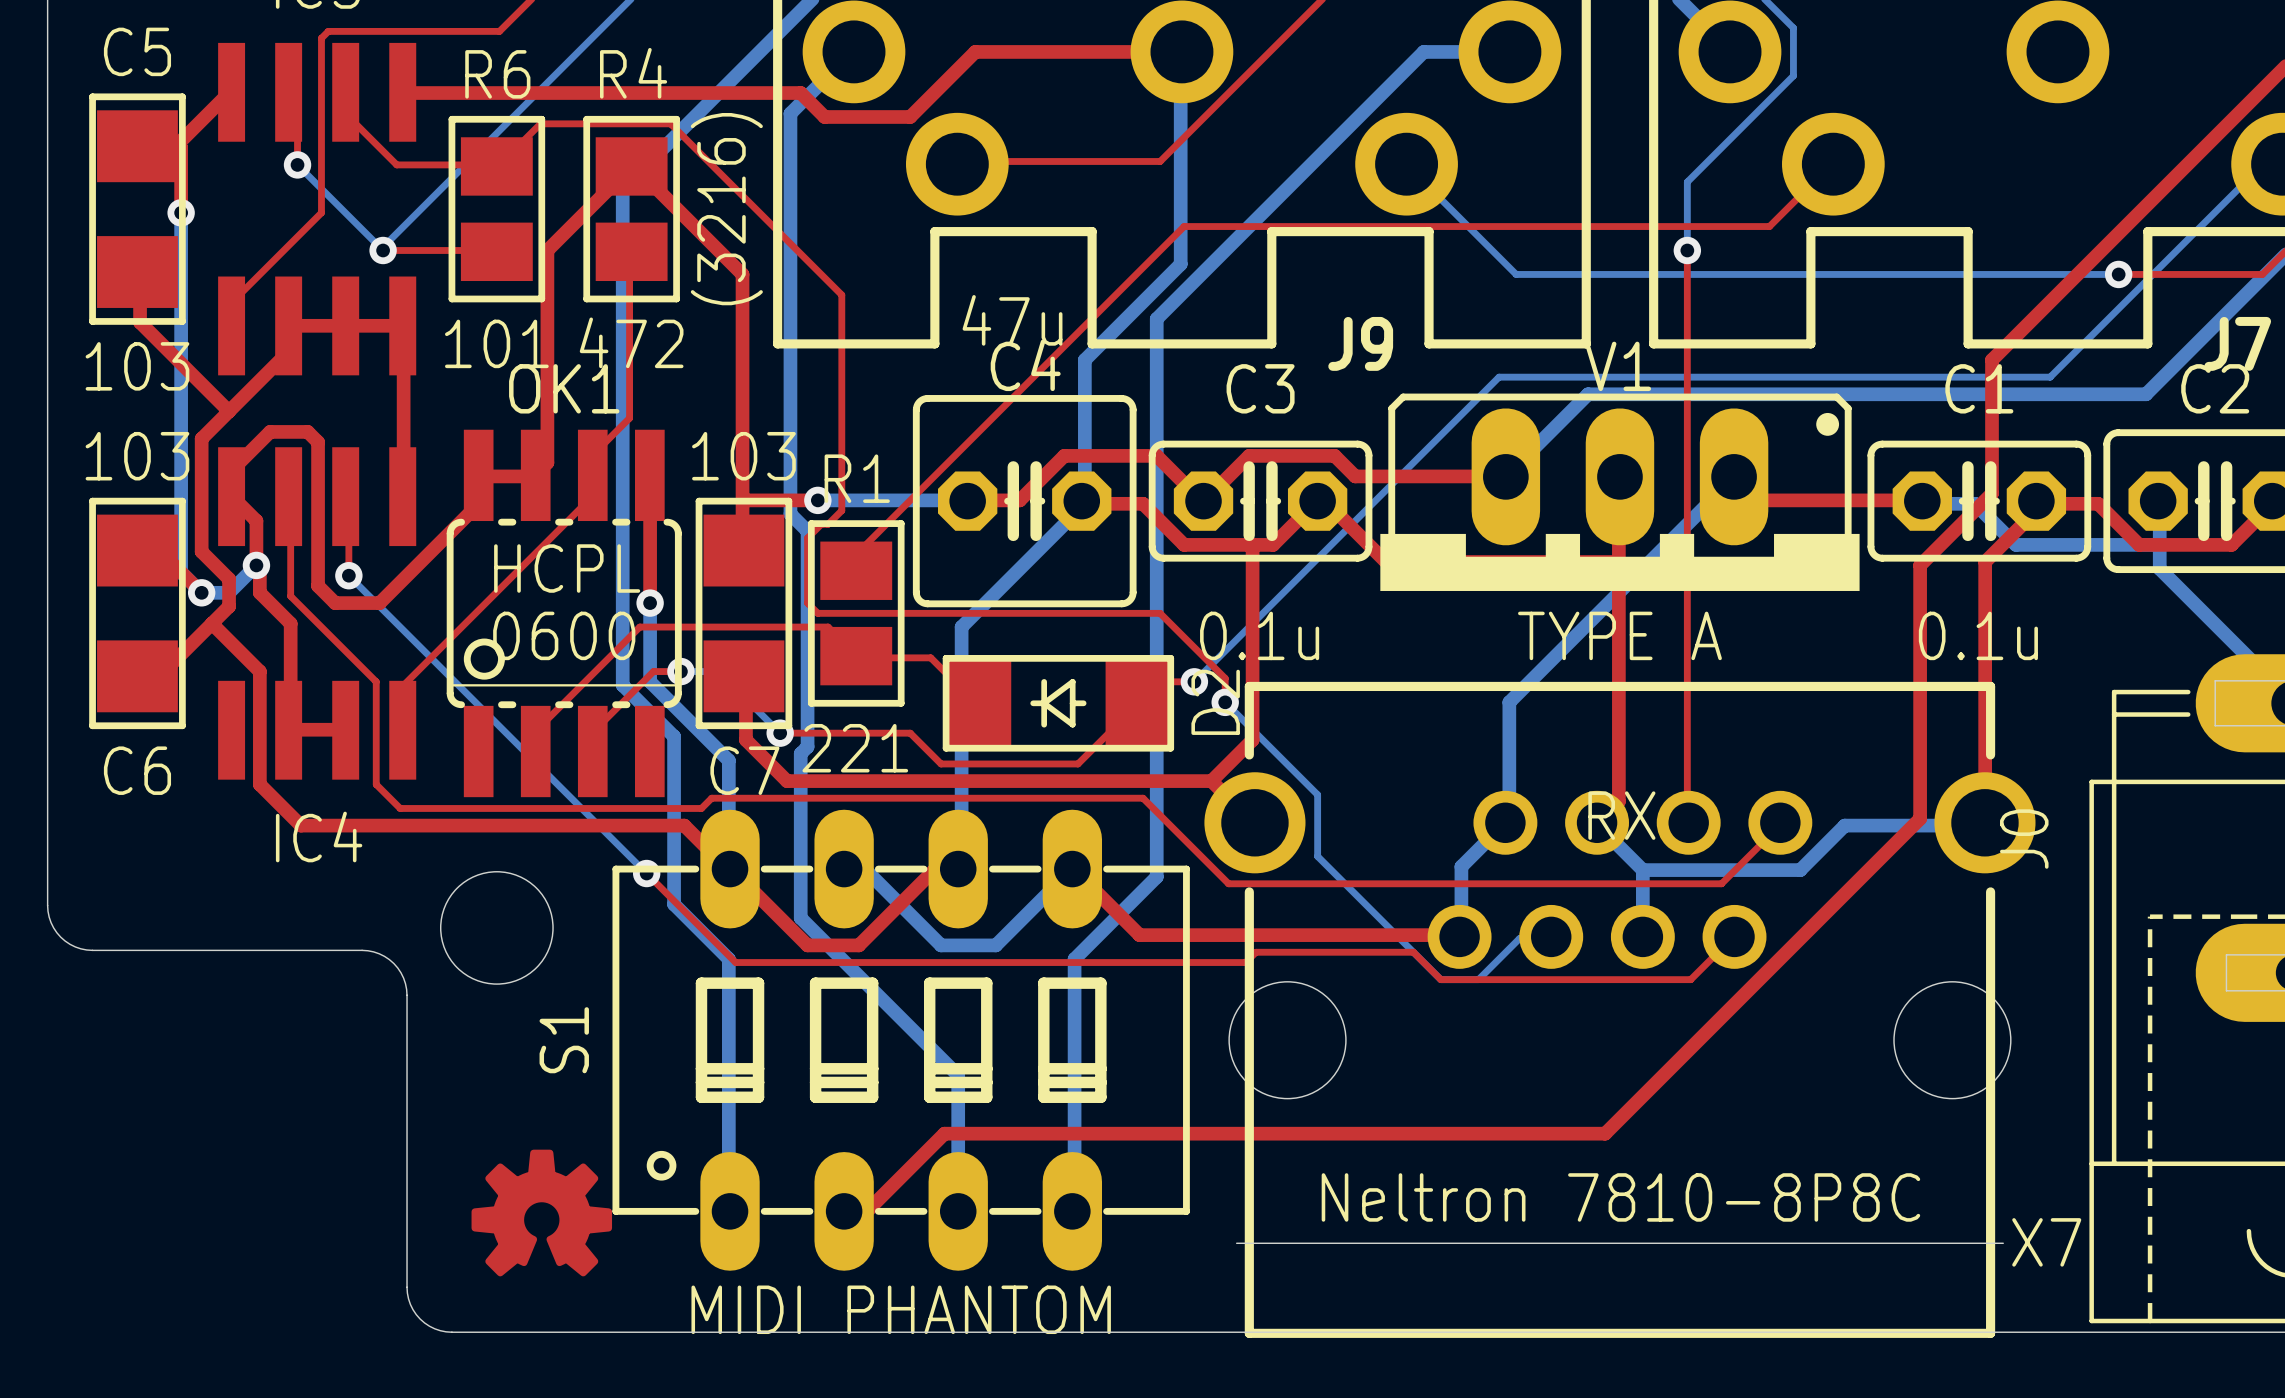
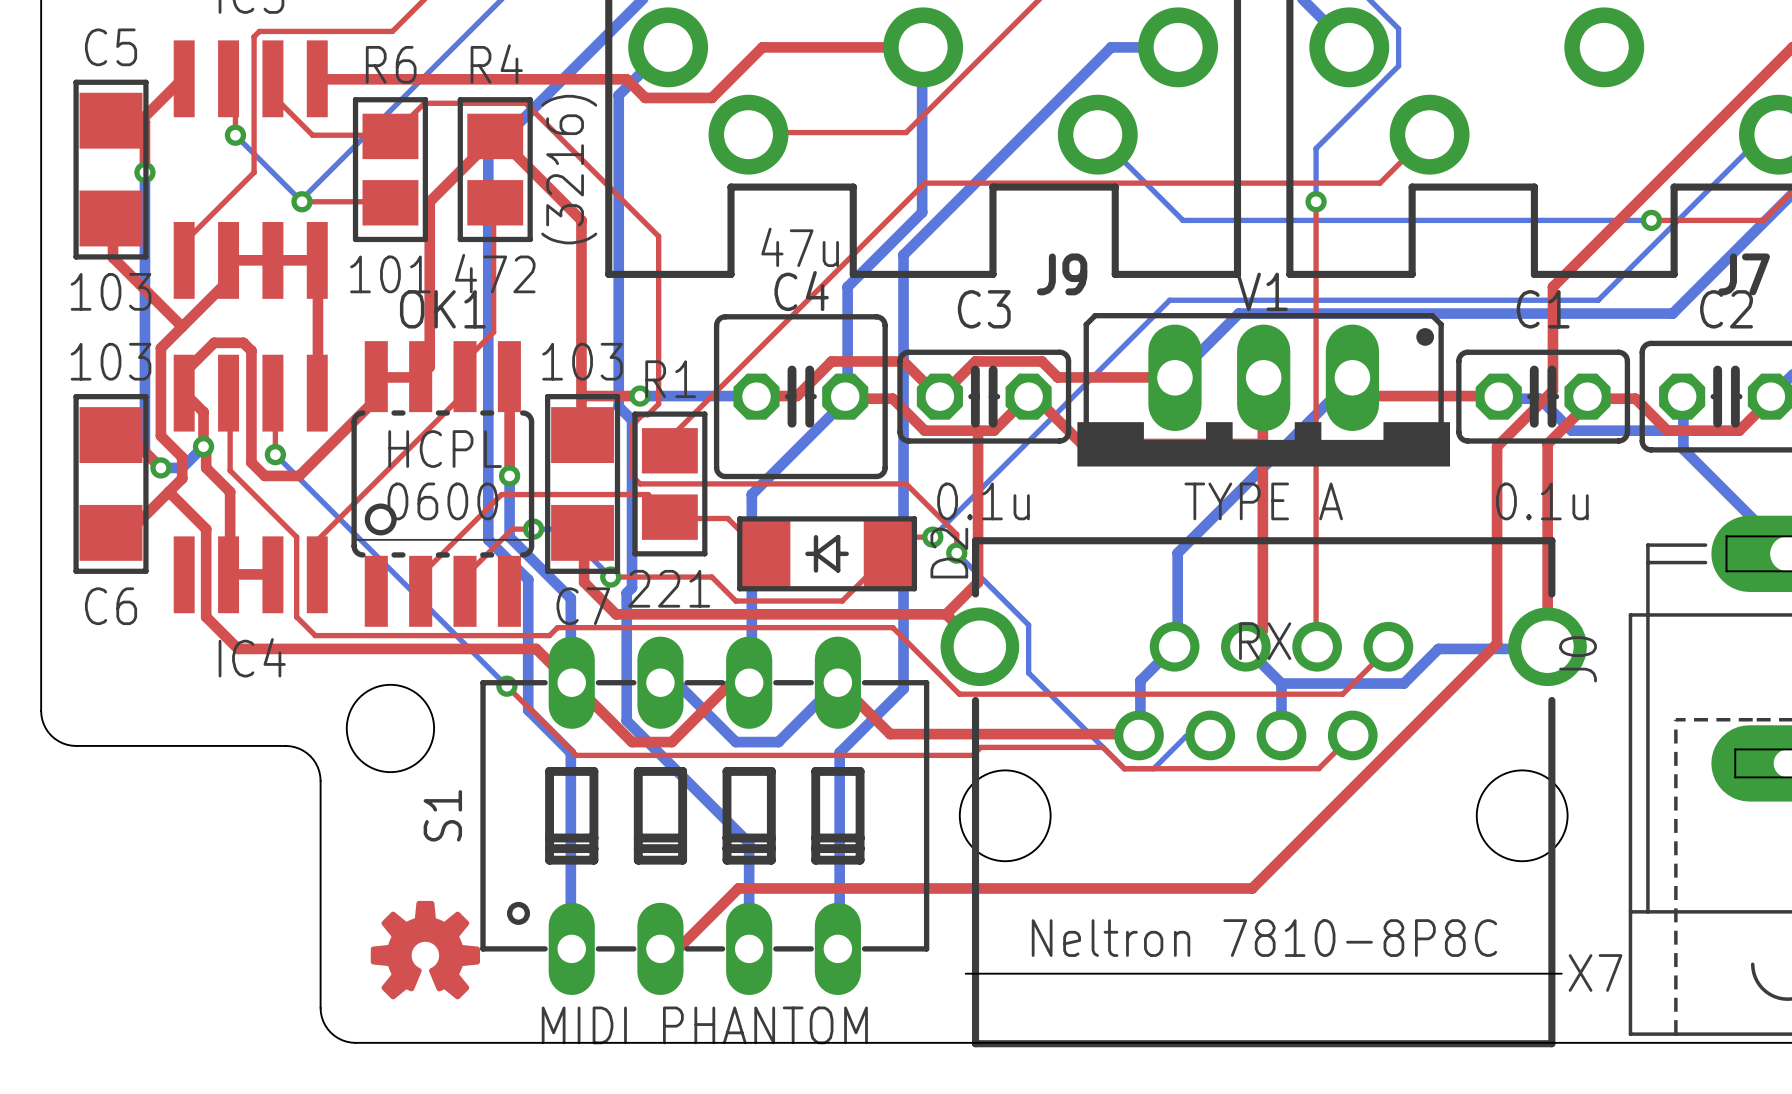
text position: 47u (1012, 320) -> 47u (800, 247)

